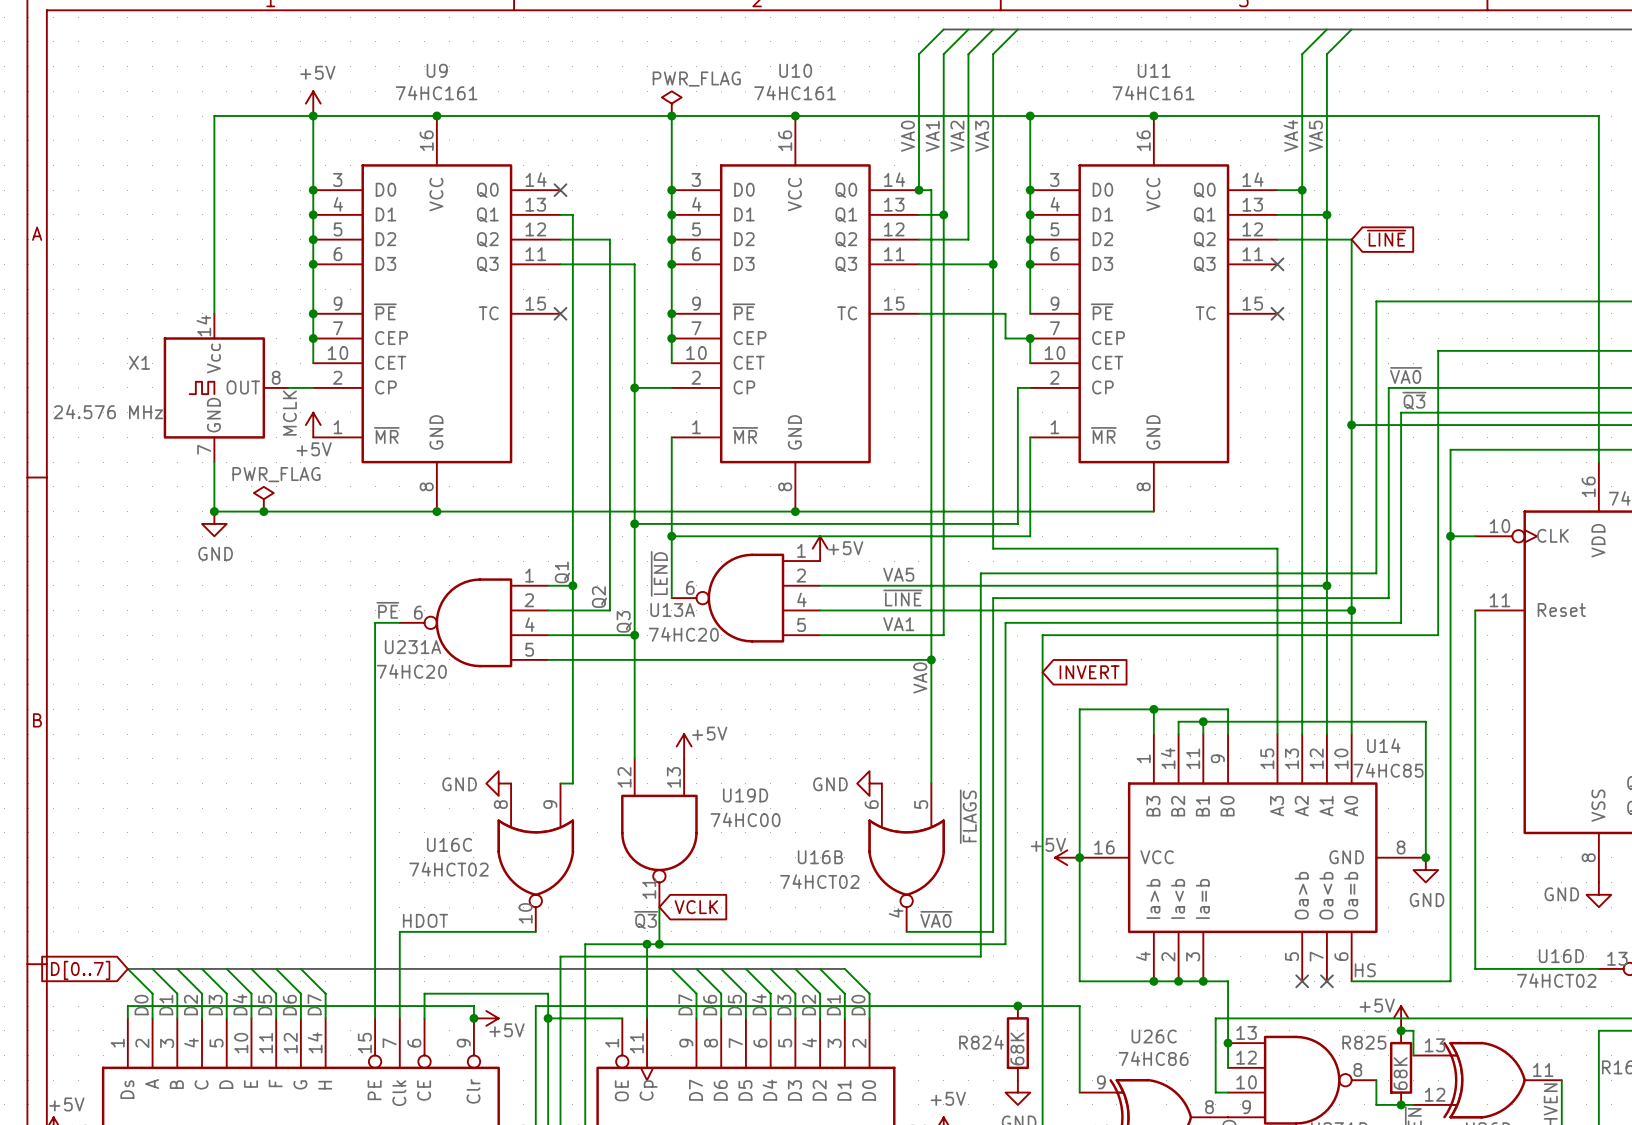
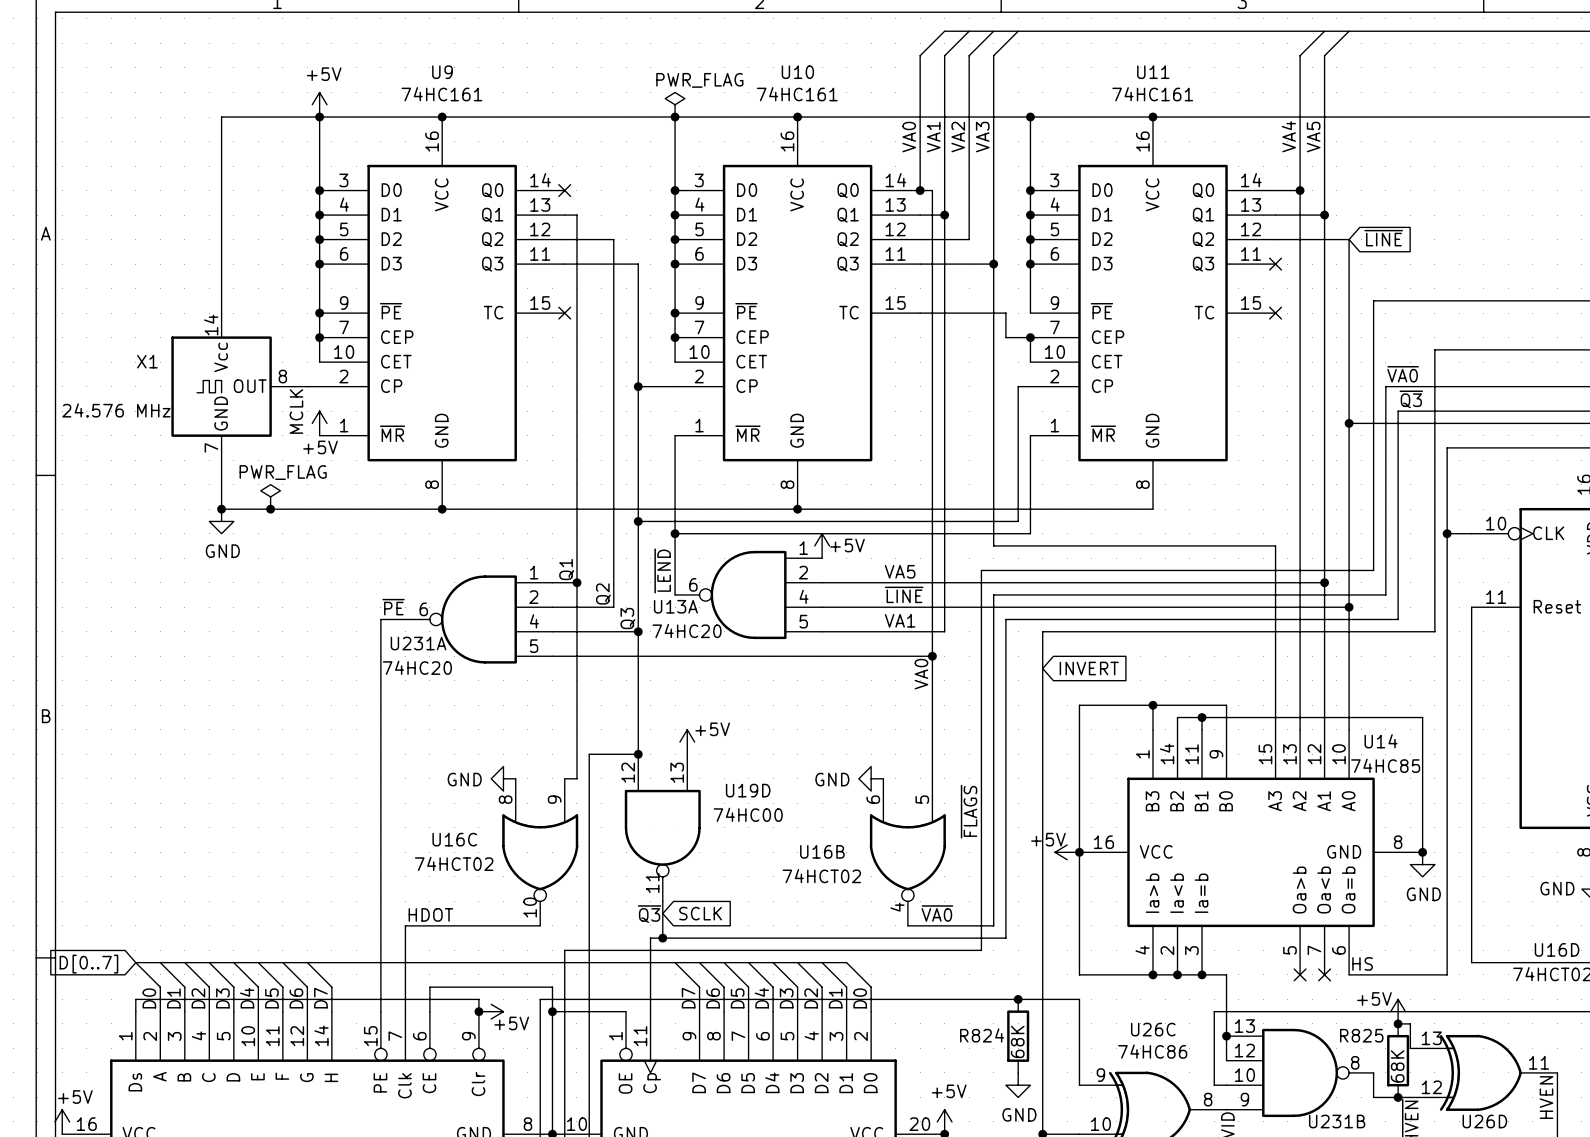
junction: none -> (638, 754)
global label: VCLK (696, 907) -> SCLK (700, 913)
wire: (585, 944) (647, 944) -> (589, 938) (589, 754) (638, 754)
junction: (647, 944) -> none

